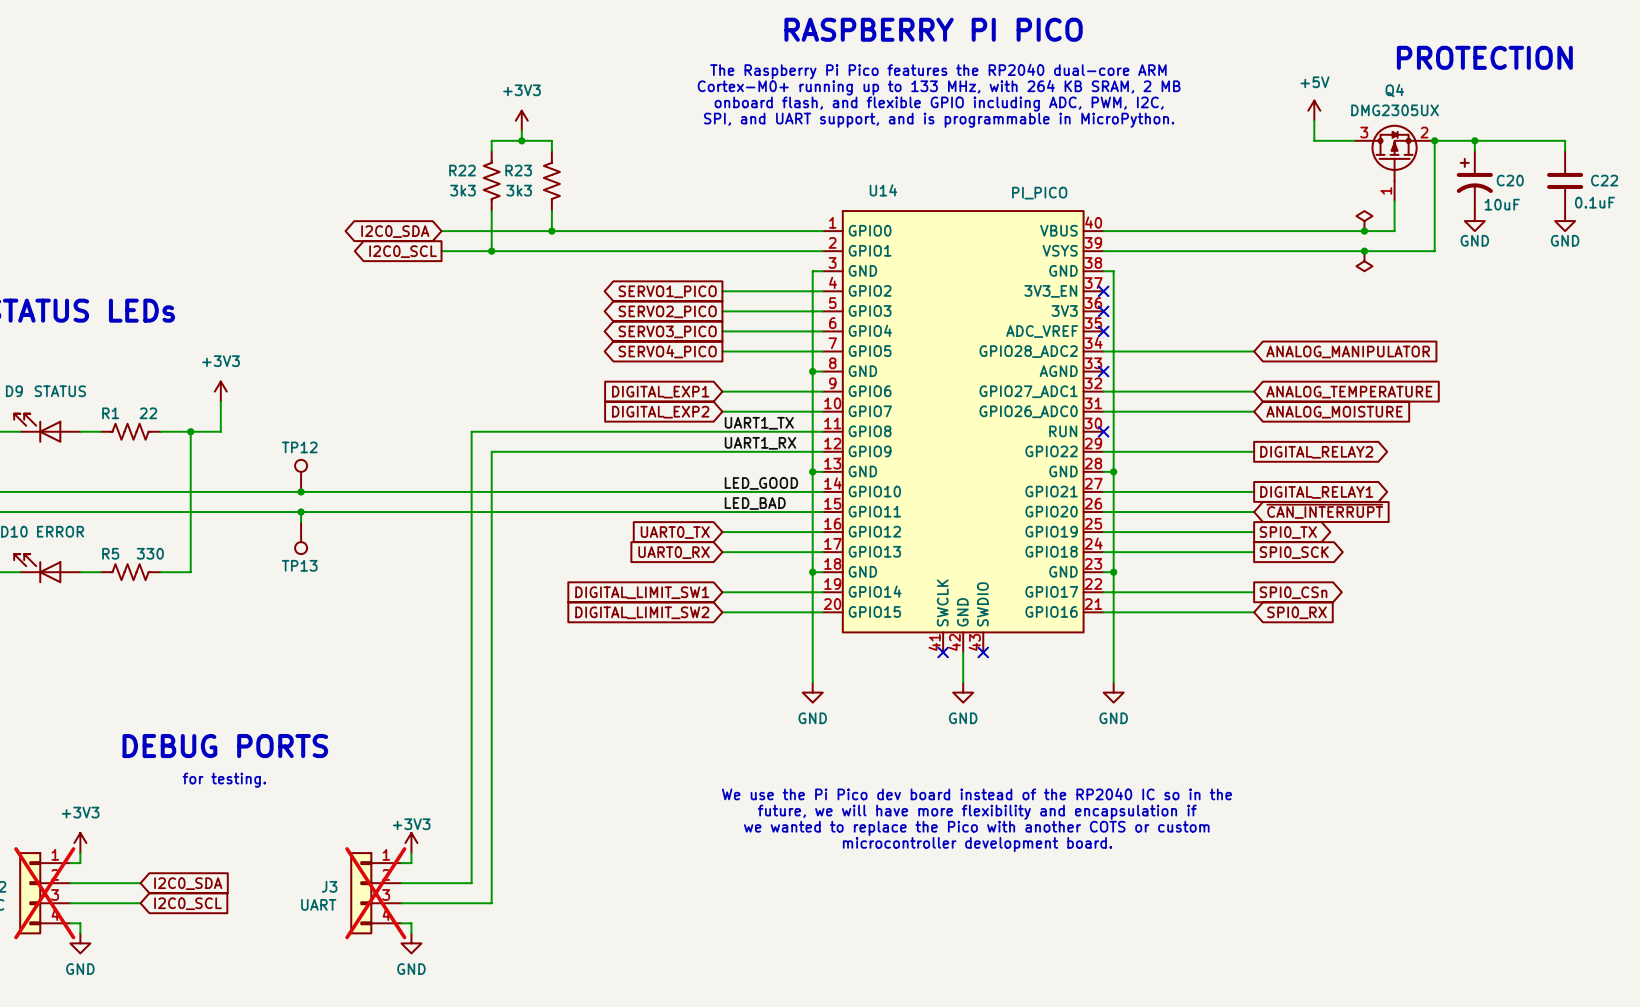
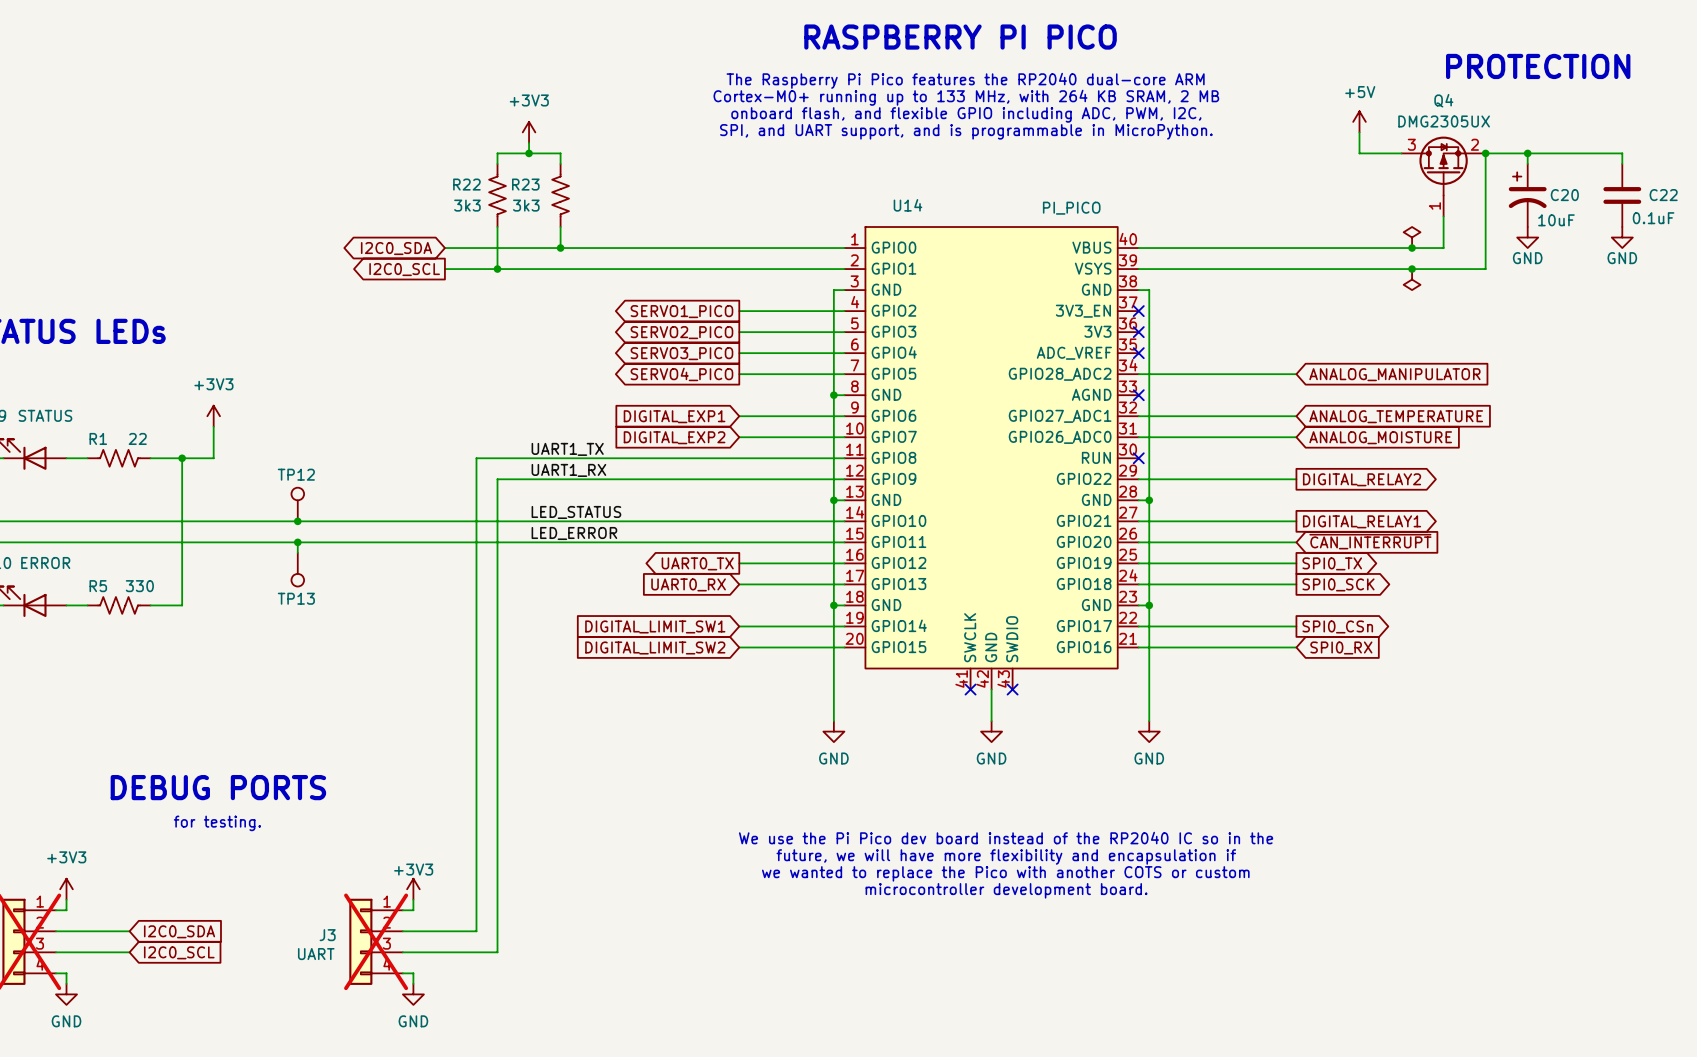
label: none -> UART1_TX (567, 449)
label: UART1_TX (759, 423) -> none
label: none -> UART1_RX (568, 470)
label: UART1_RX (760, 443) -> none
label: none -> LED_STATUS (576, 512)
label: LED_GOOD (761, 483) -> none
label: none -> LED_ERROR (574, 533)
label: LED_BAD (755, 503) -> none
global label shape: input (675, 532) -> output (697, 563)

